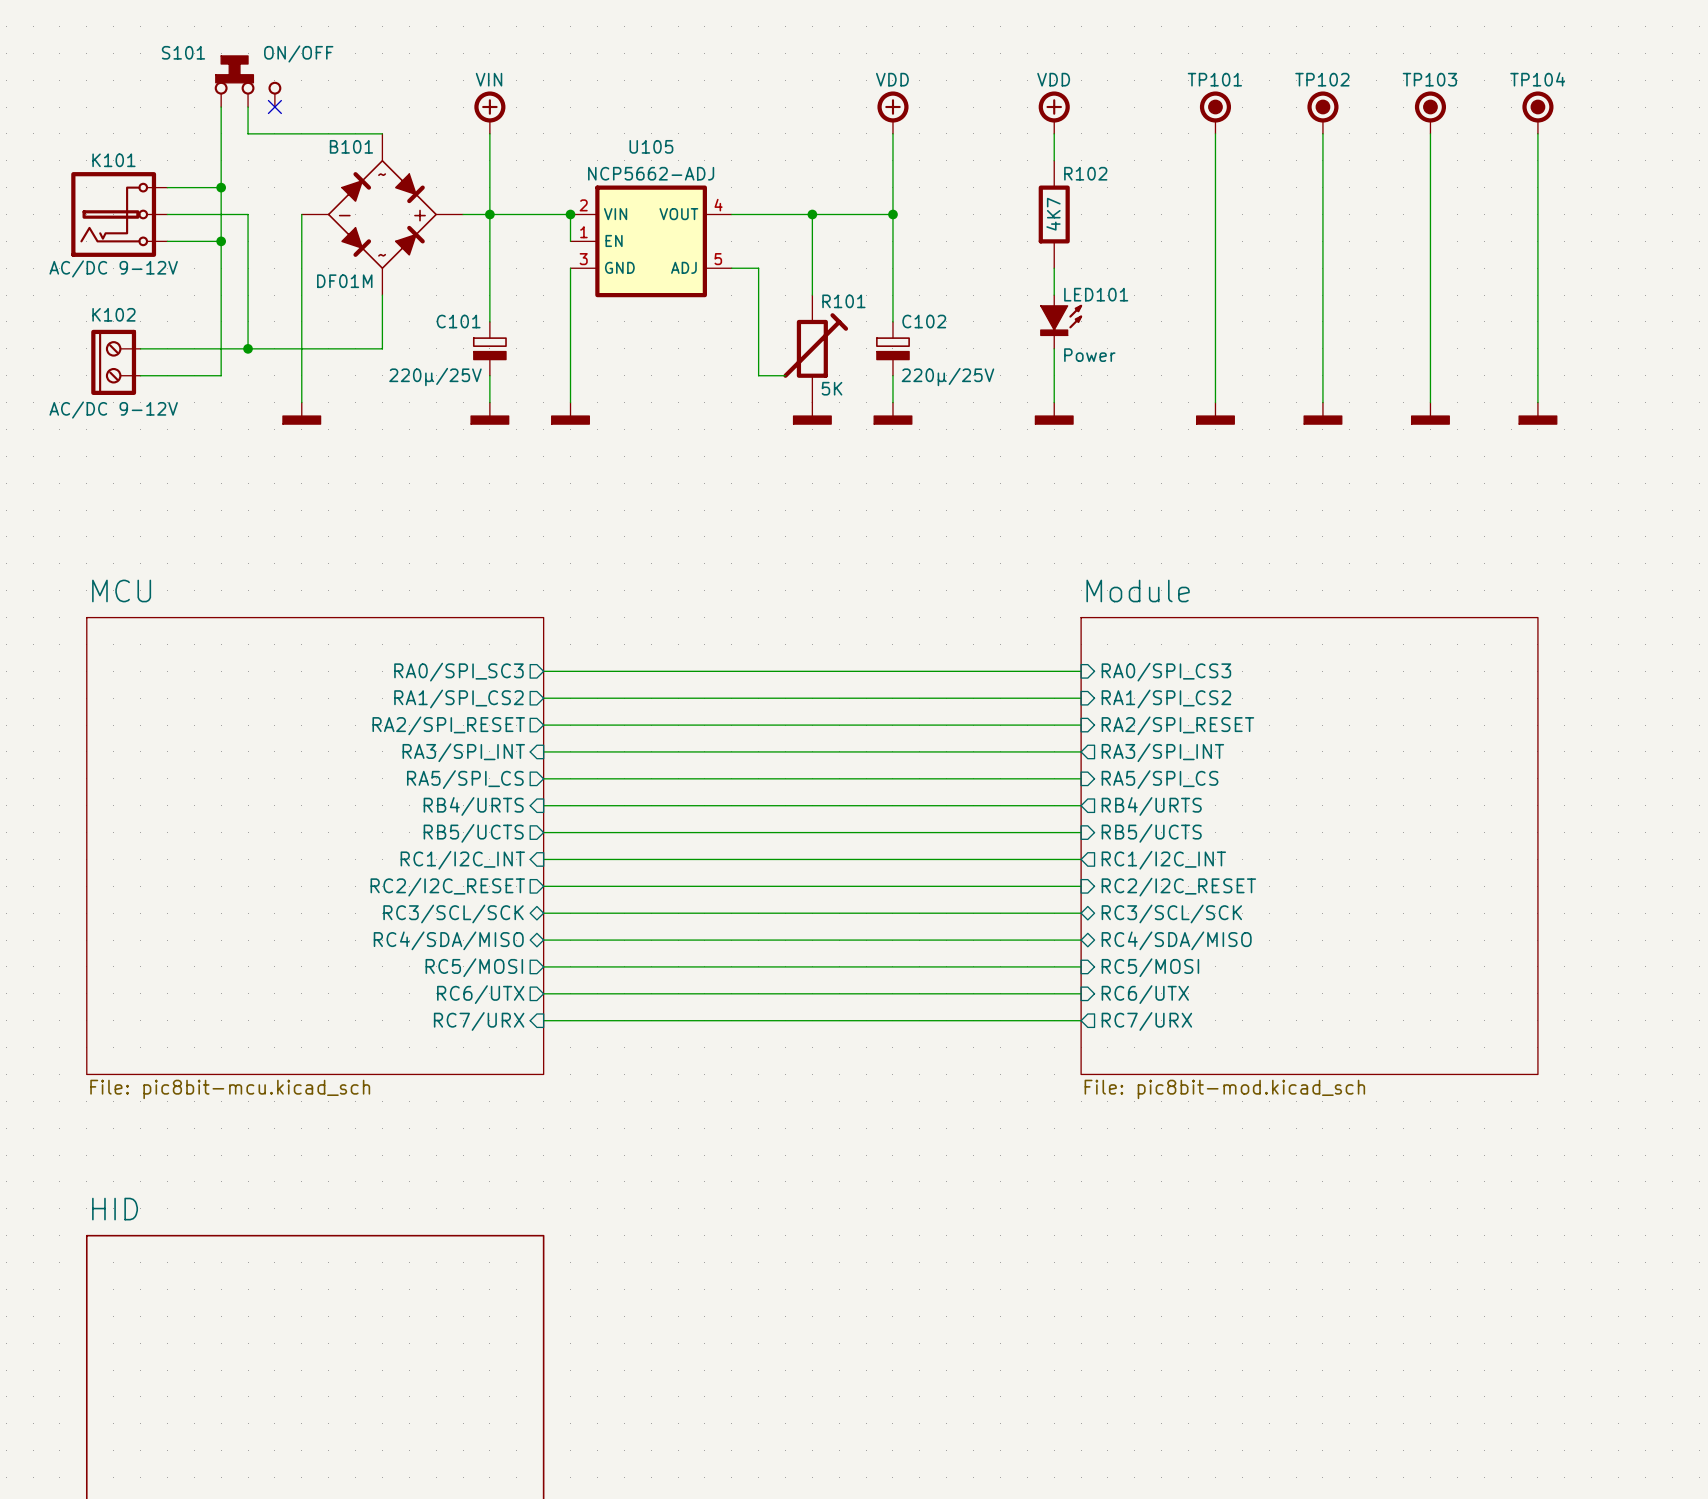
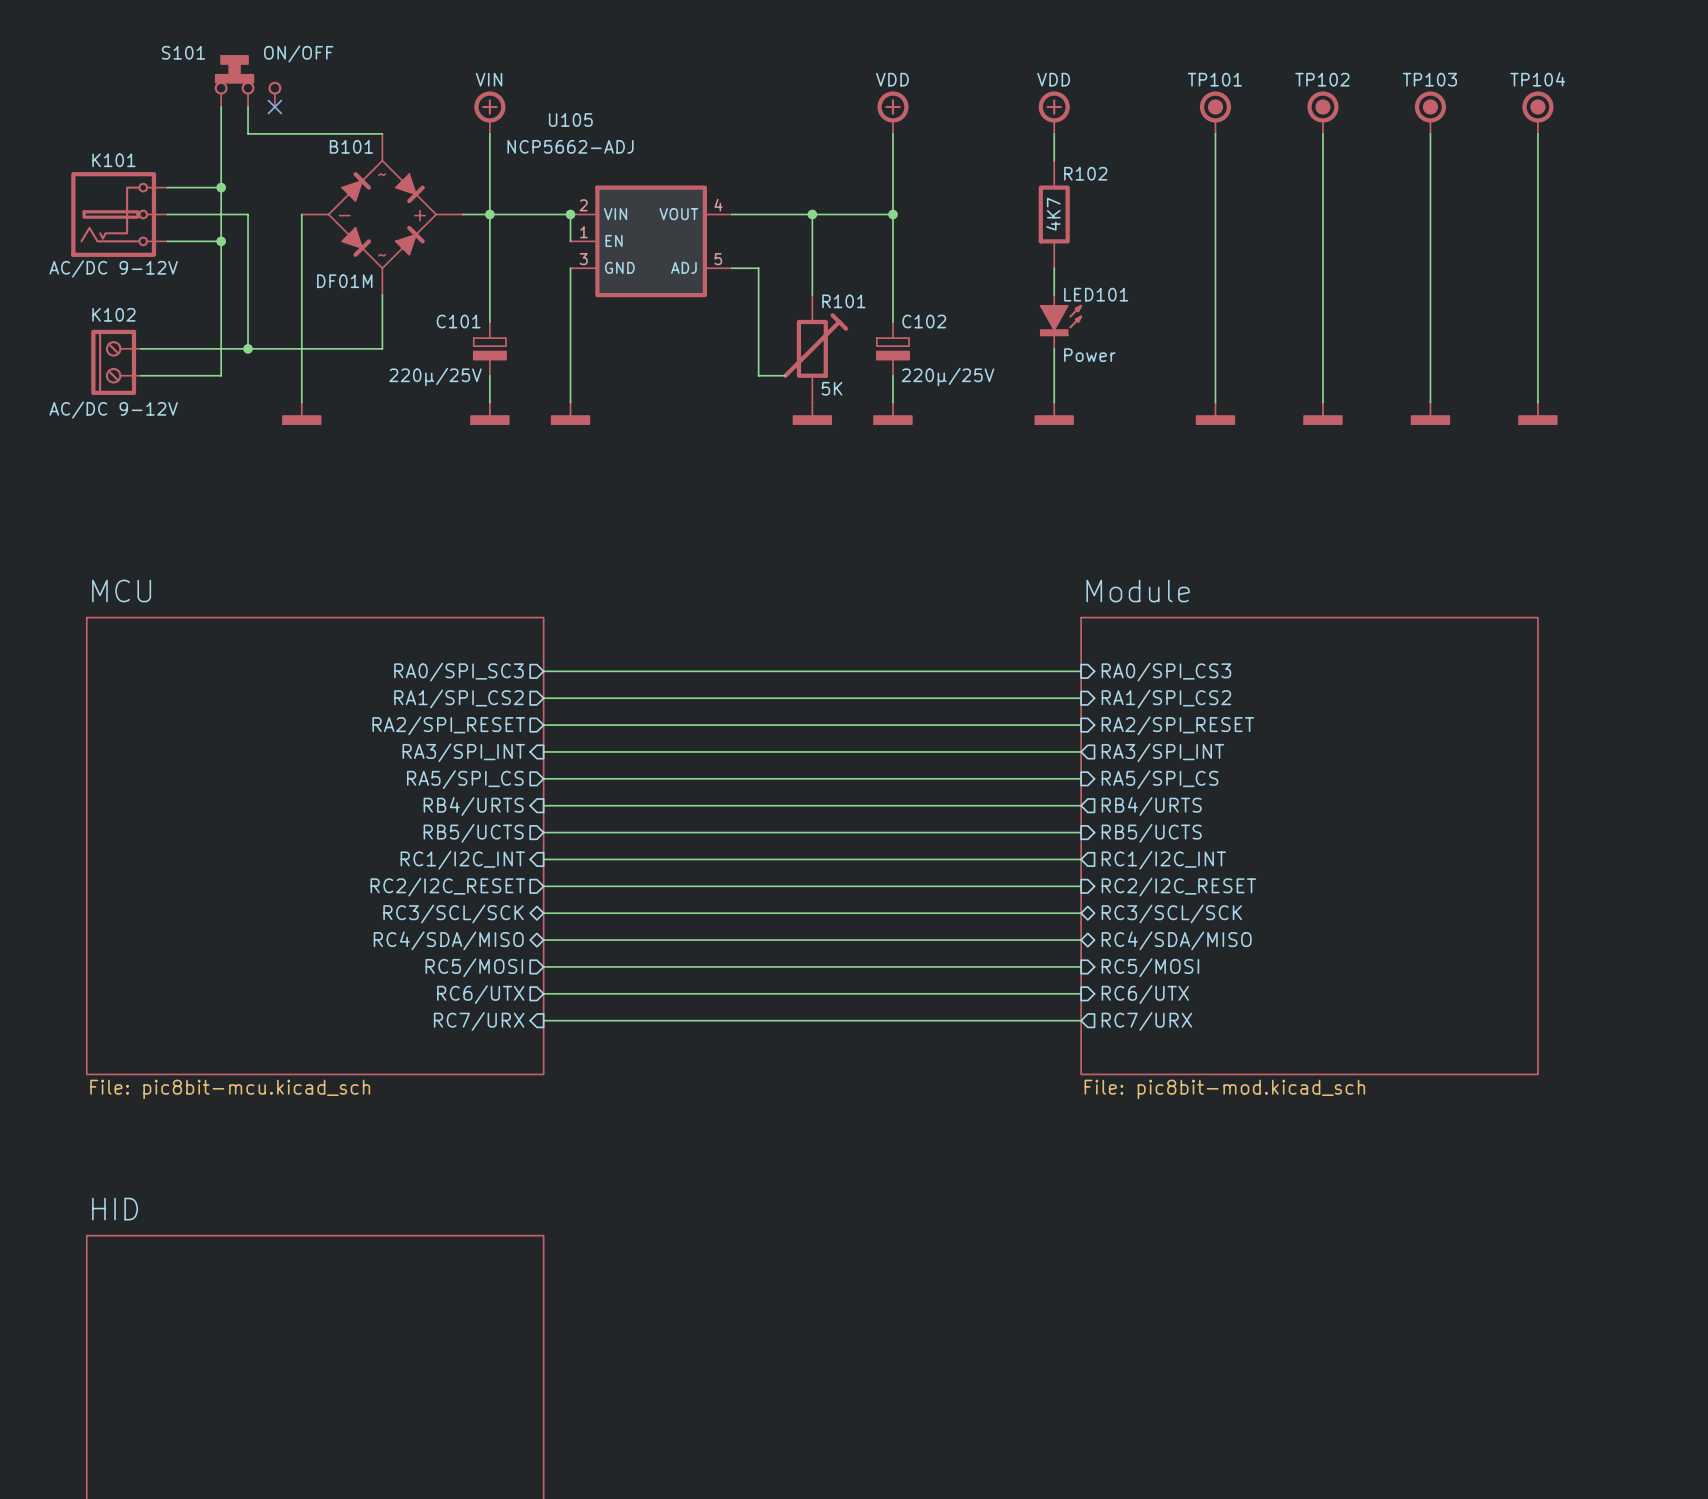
U105 name position: U105 (651, 146) -> U105 (570, 119)
U105 value position: NCP5662-ADJ (651, 173) -> NCP5662-ADJ (570, 146)

